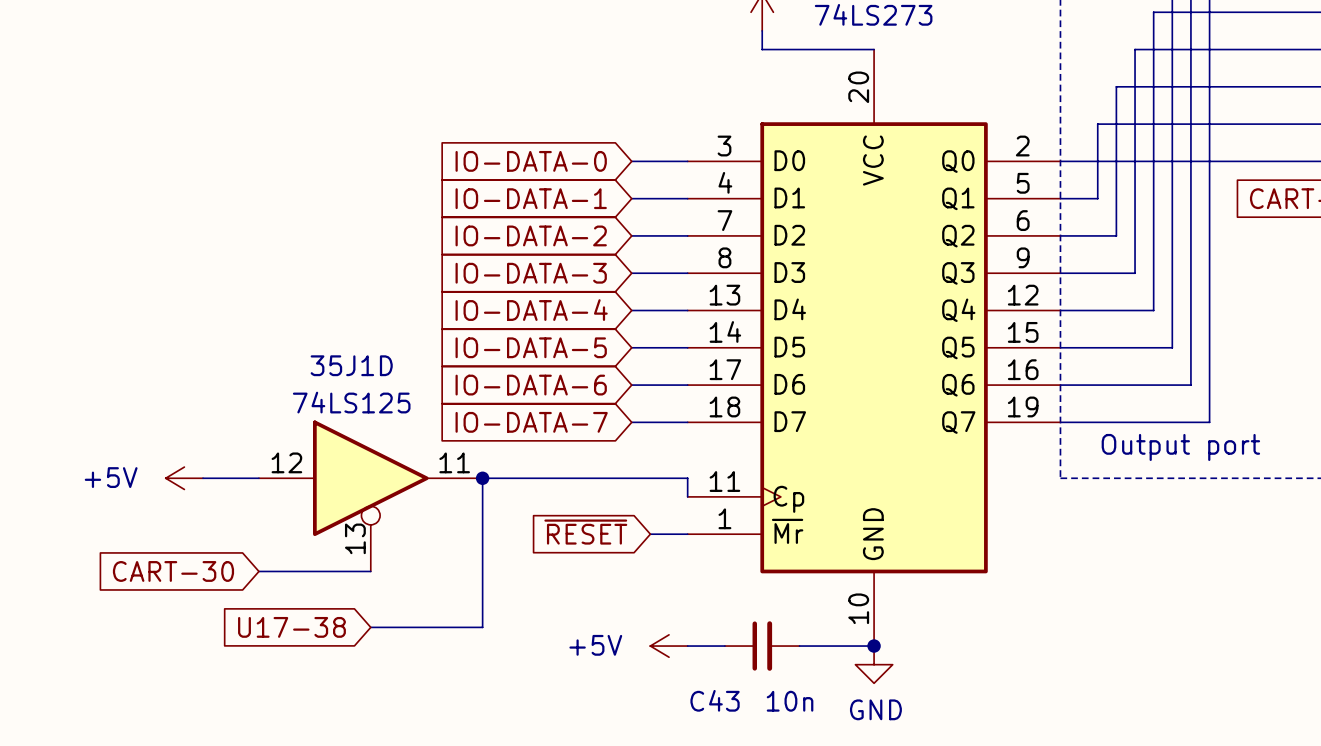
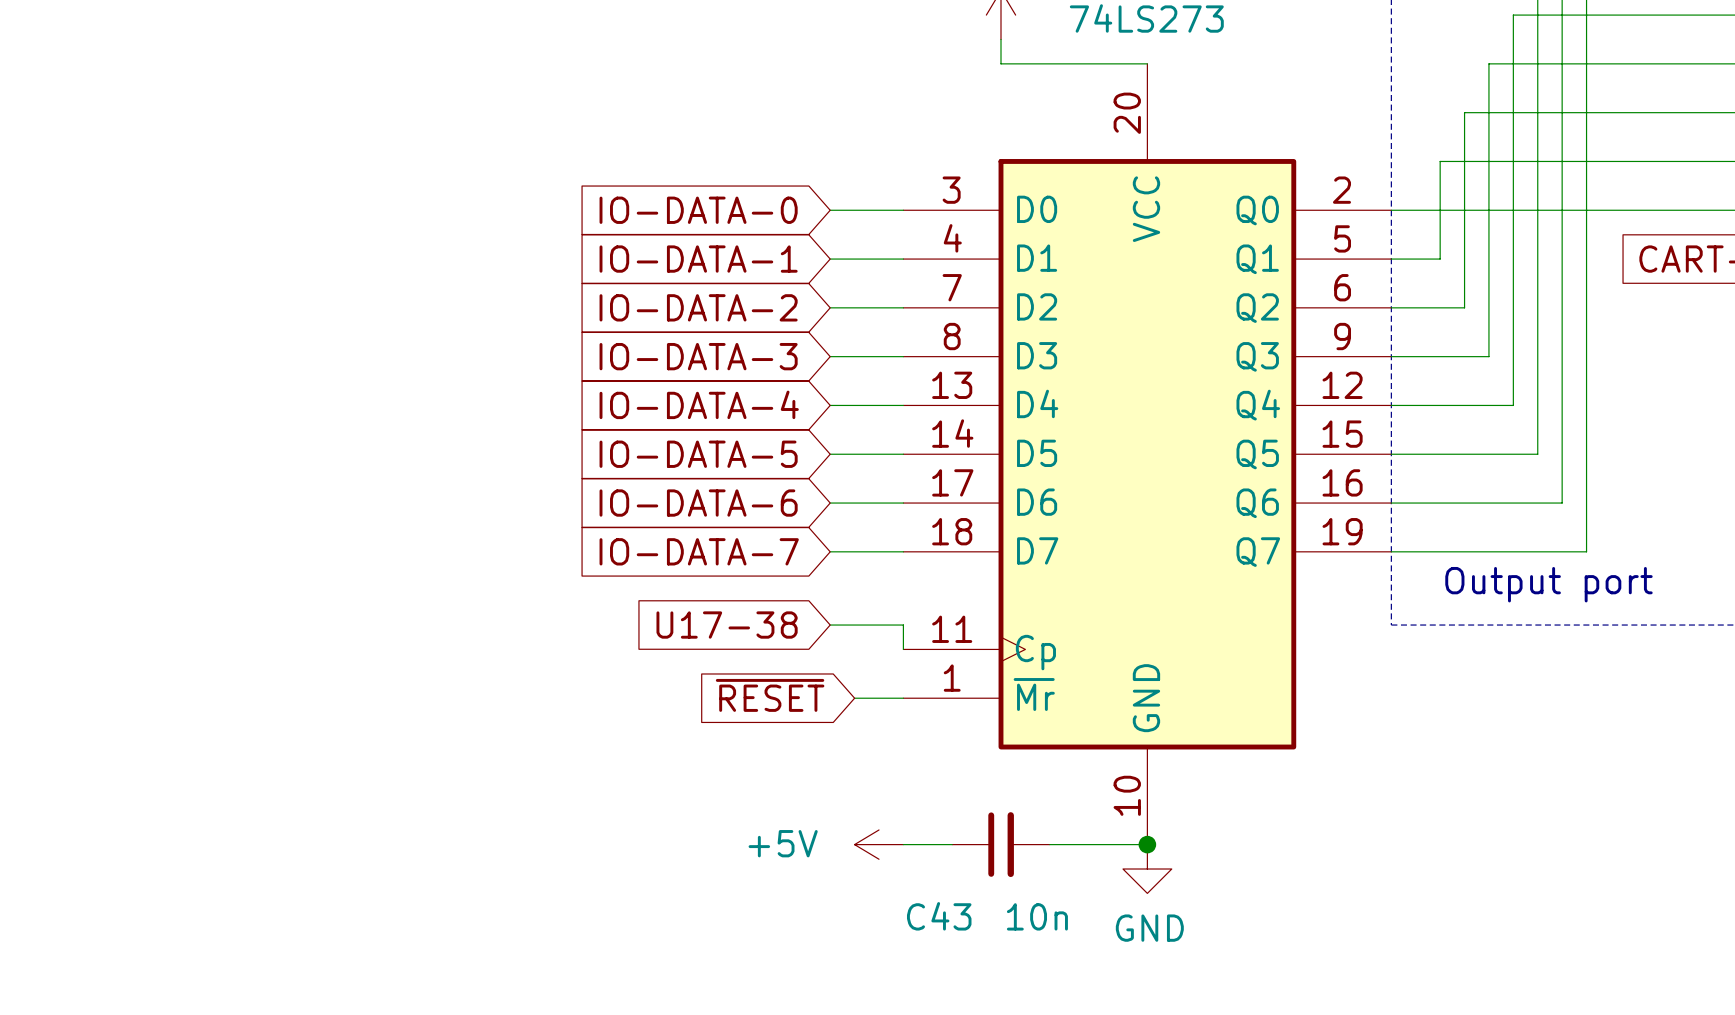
power symbol: +5V (184, 478) -> none
wire: (203, 478) (258, 478) -> none
junction: (482, 478) -> none
wire: (631, 478) (482, 478) (482, 627) (370, 627) -> none
35J1D: 74LS125 (370, 495) -> none
global label: CART-30 (173, 571) -> none
wire: (258, 571) (370, 571) -> none
global label position: U17-38 (291, 627) -> U17-38 (727, 625)

